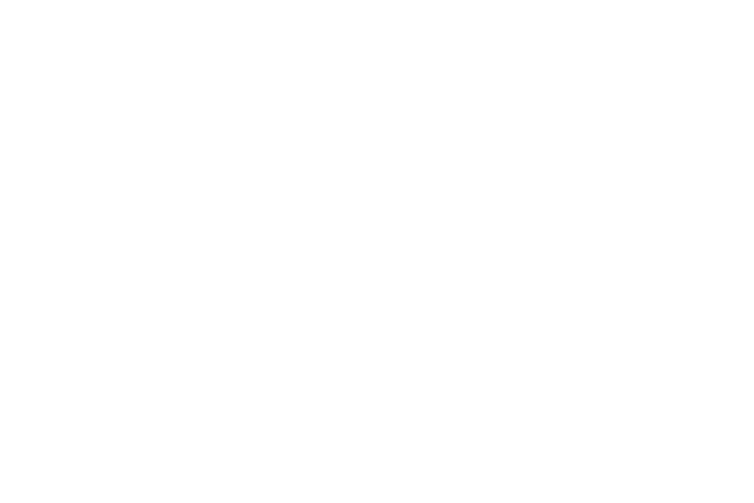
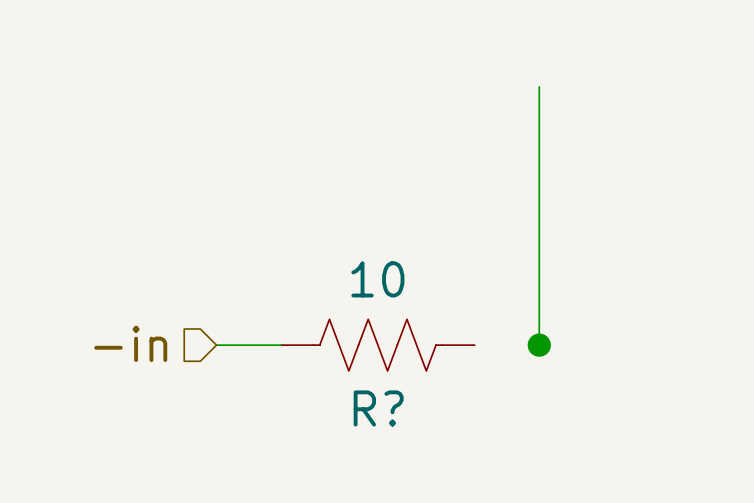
wire: none -> (539, 86) (539, 345)
hierarchical label: none -> -in (130, 343)
wire: none -> (216, 345) (281, 345)
R?: none -> 10 (377, 345)
junction: none -> (539, 345)

